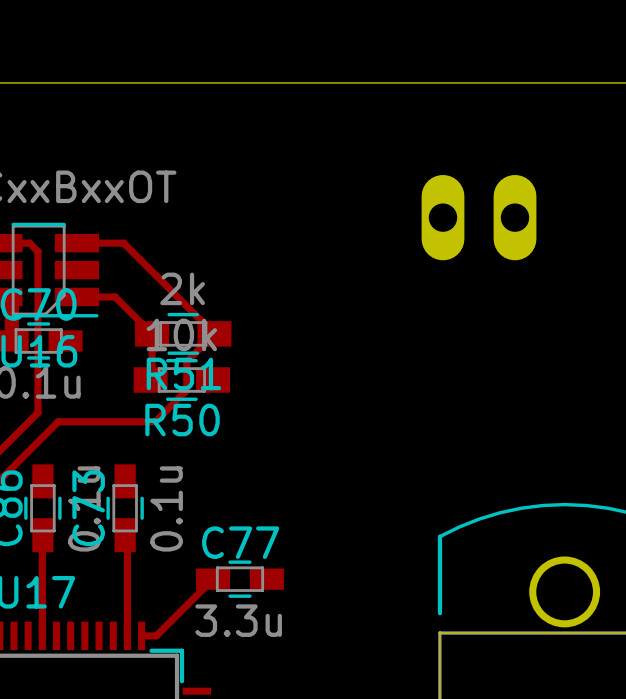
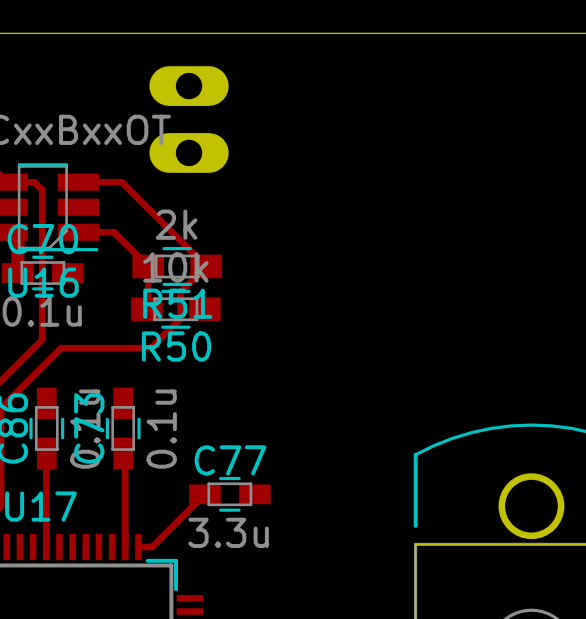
part rotation: 0° (479, 217) -> 90° clockwise (189, 119)
part position: (479, 217) -> (189, 119)

